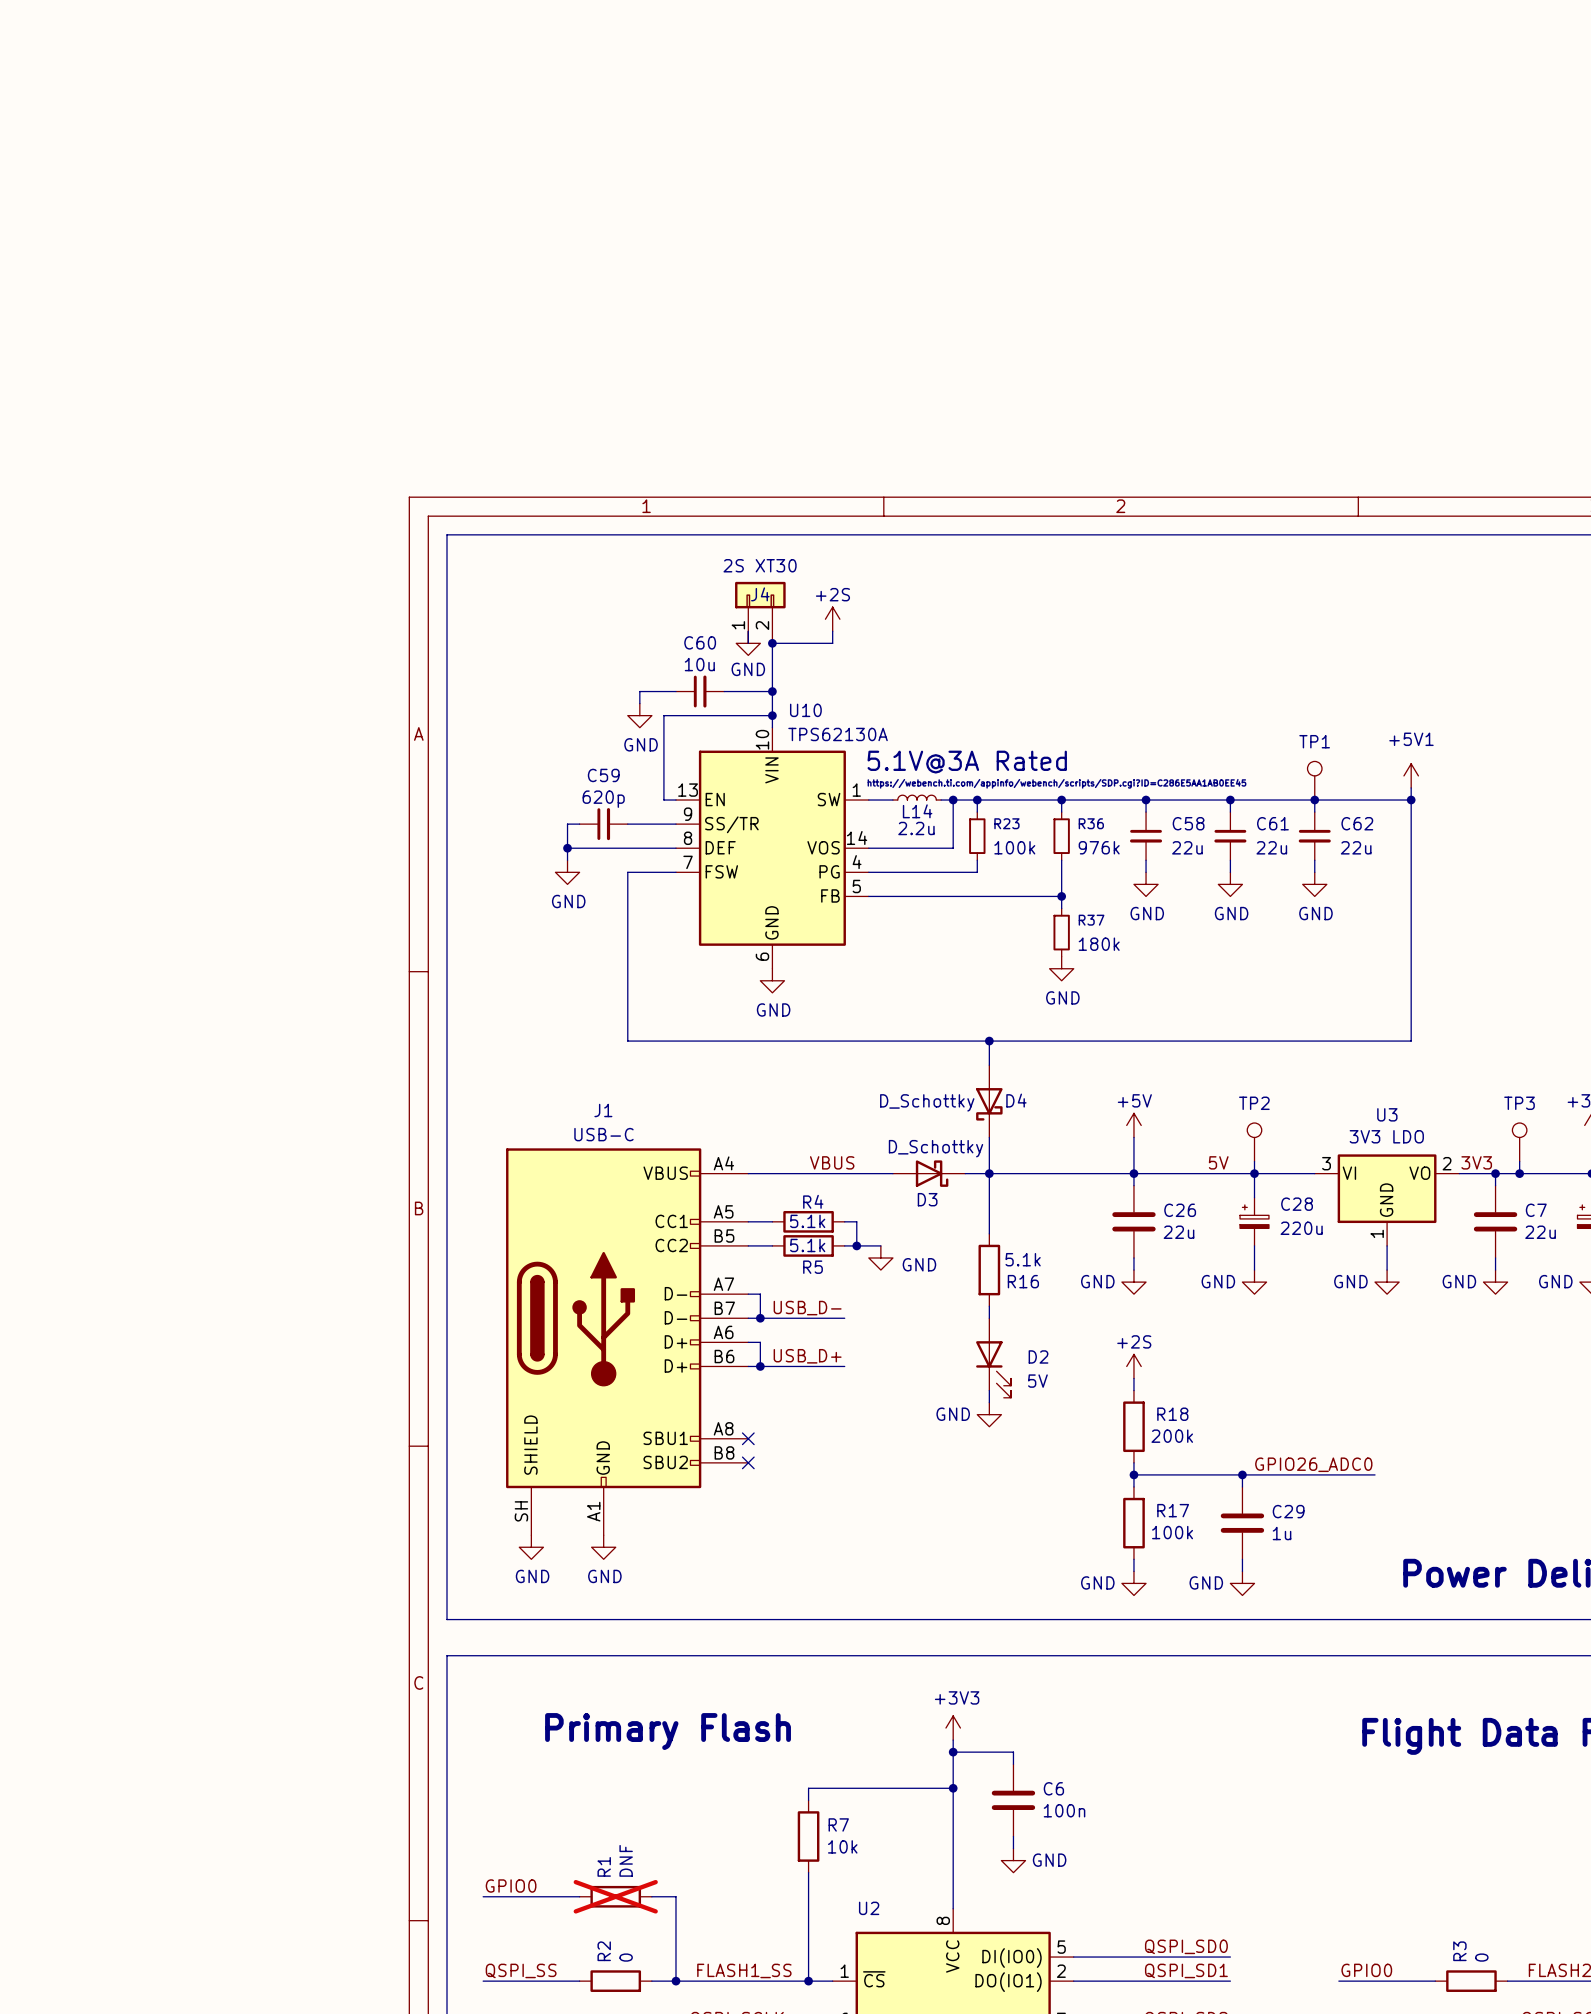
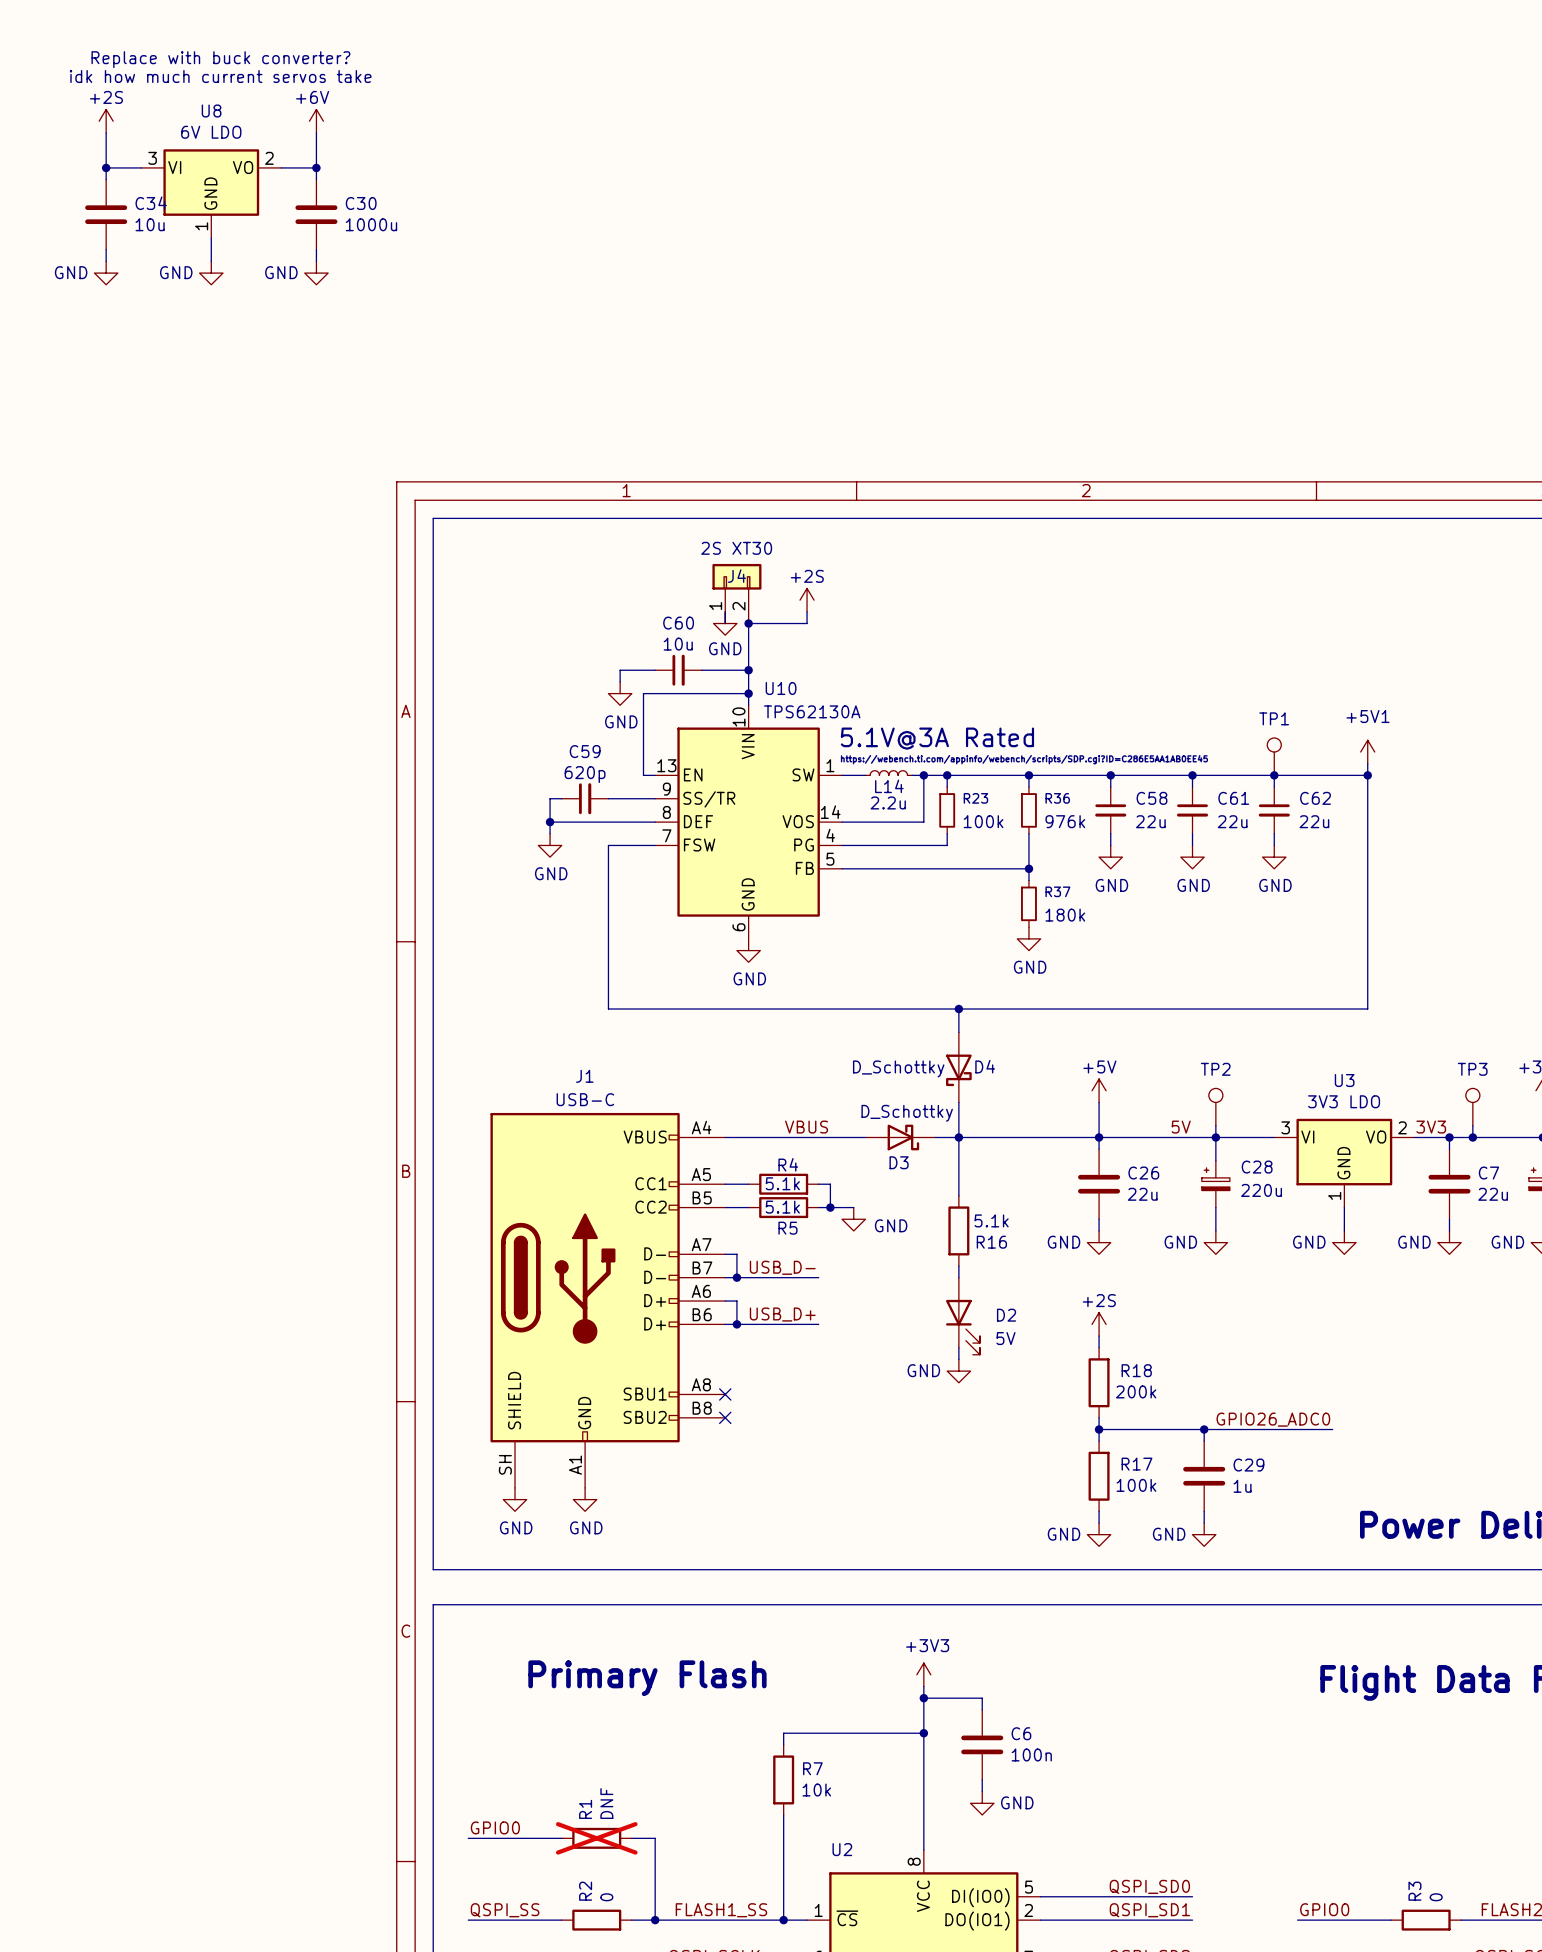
text: none -> Replace with buck converter? (220, 59)
text: none -> idk how much current servos take (220, 76)
power symbol: none -> +2S (106, 121)
power symbol: none -> +6V (316, 121)
wire: none -> (106, 132) (106, 179)
wire: none -> (316, 132) (316, 179)
wire: none -> (106, 167) (141, 167)
junction: none -> (106, 167)
wire: none -> (281, 167) (316, 167)
junction: none -> (316, 167)
U8: none -> 6V LDO (211, 193)
C34: none -> 10u (106, 214)
C30: none -> 1000u (316, 214)
wire: none -> (211, 238) (211, 261)
wire: none -> (106, 249) (106, 261)
wire: none -> (316, 249) (316, 261)
power symbol: none -> GND (106, 273)
power symbol: none -> GND (211, 273)
power symbol: none -> GND (316, 273)

